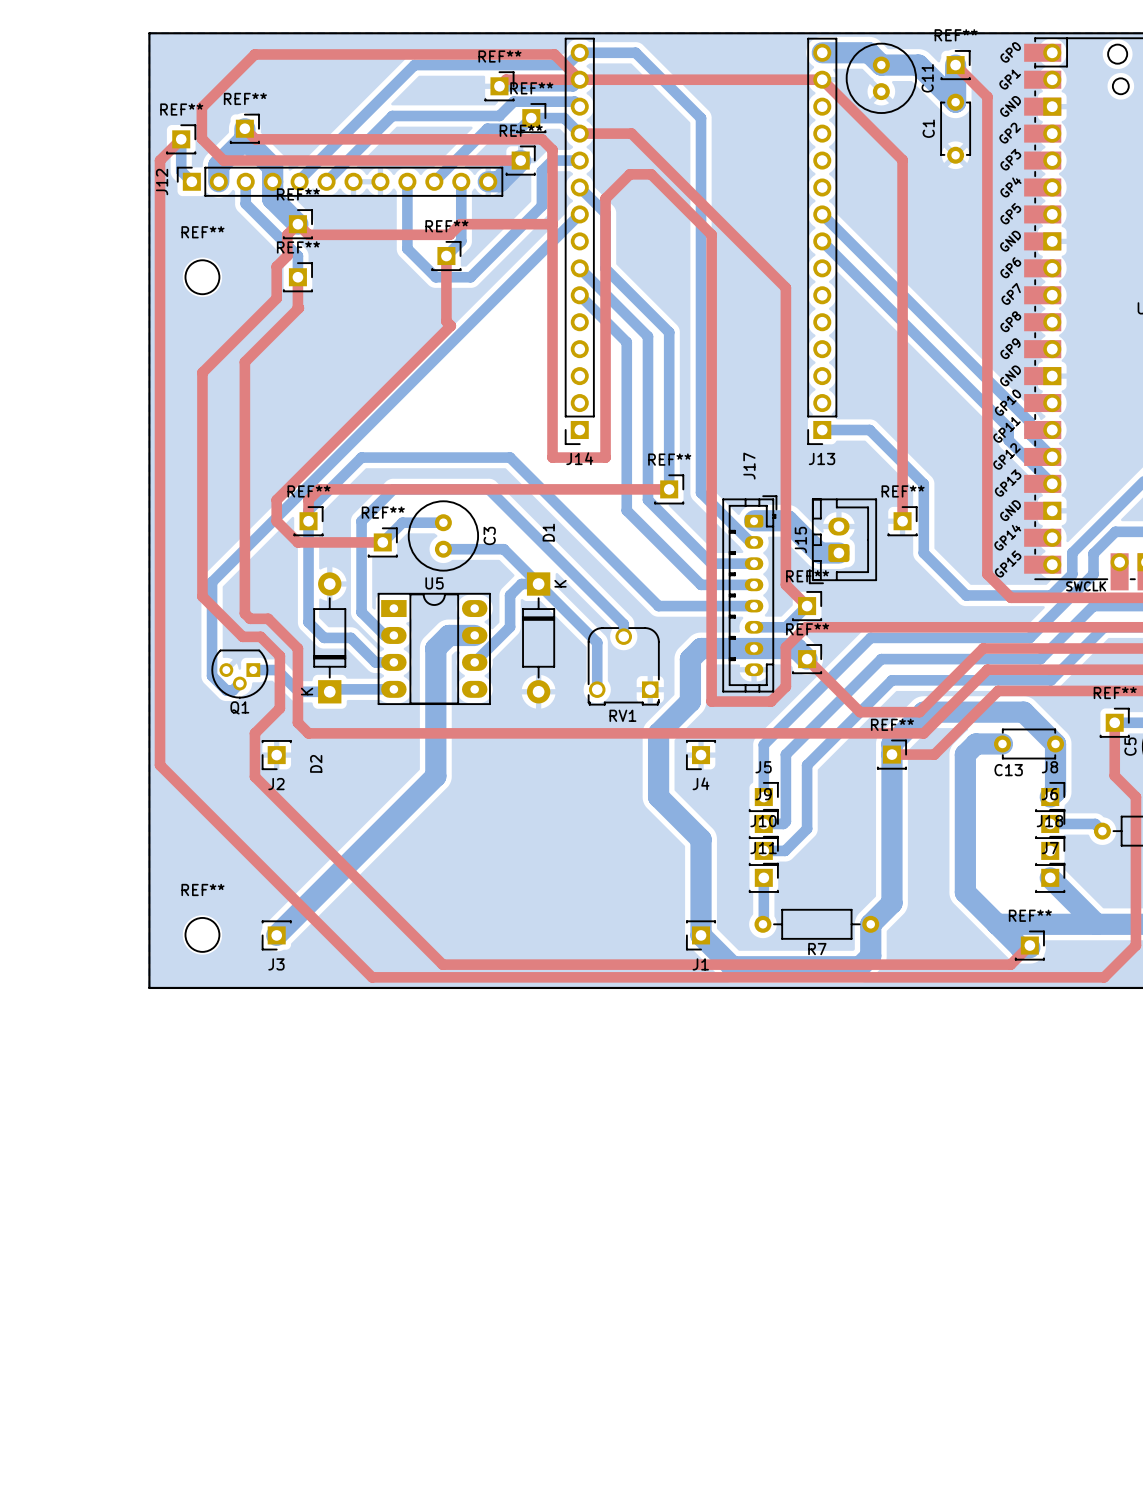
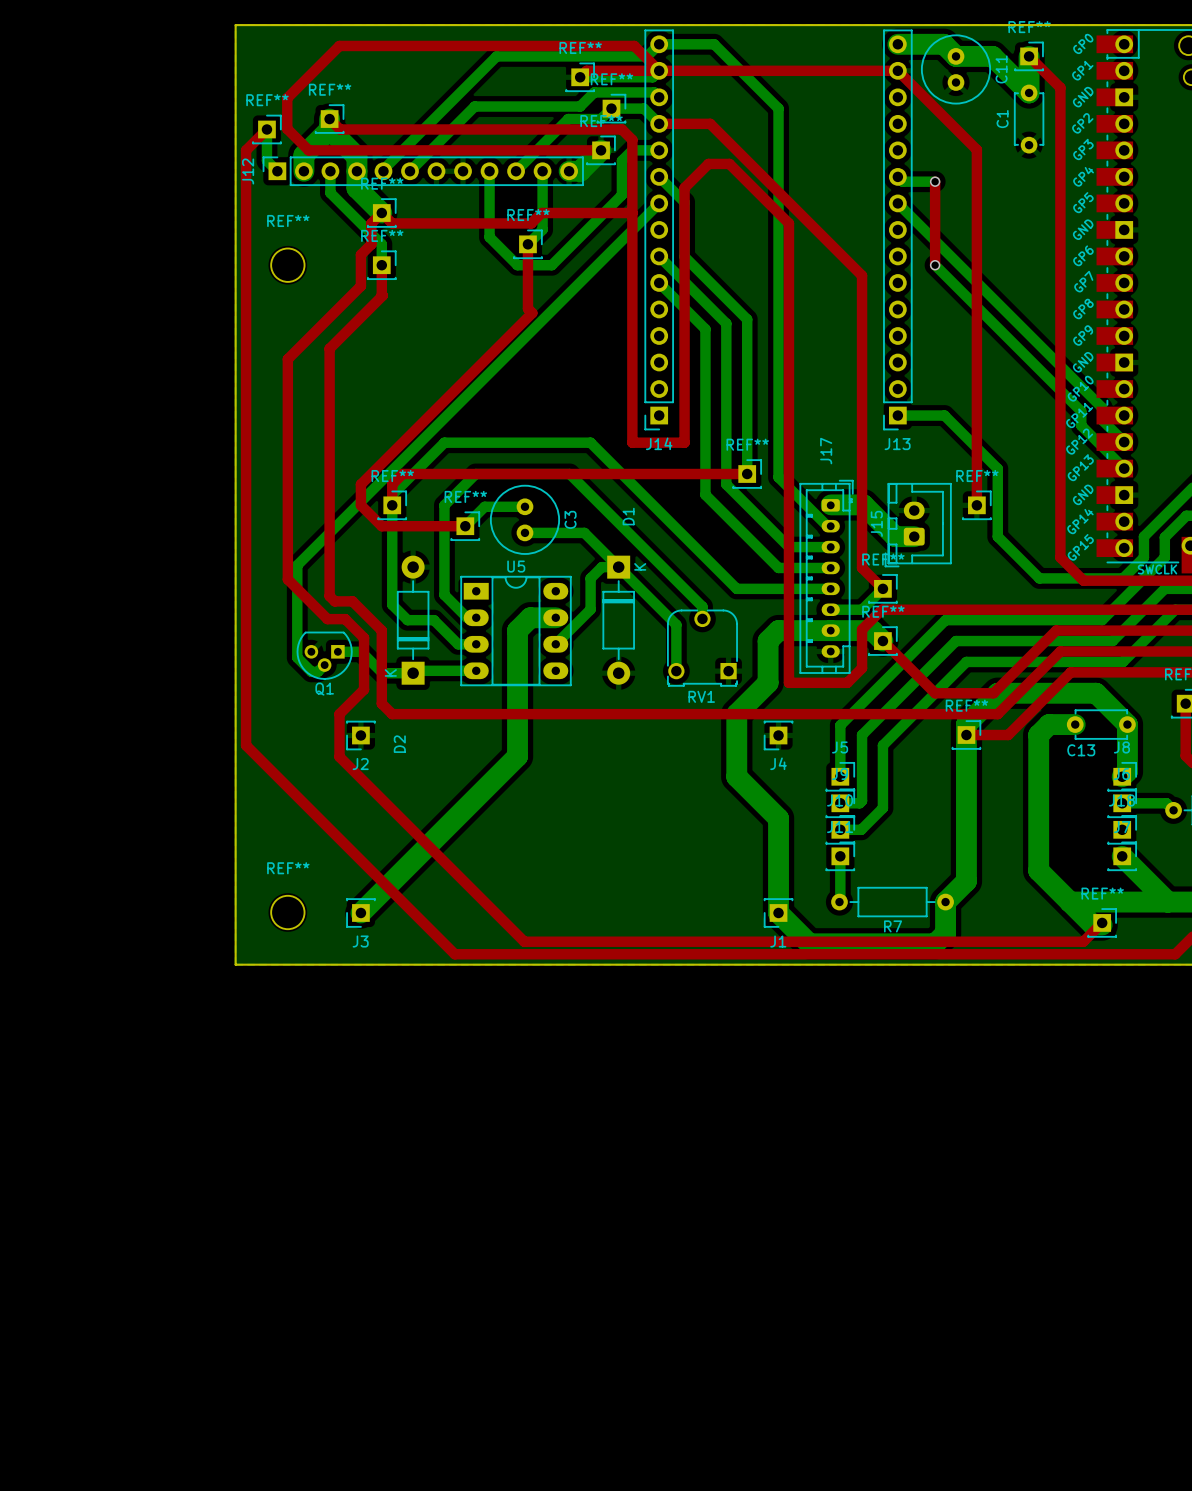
bottom track: none -> (897, 176) (902, 181) (935, 181)
top track: none -> (935, 181) (935, 265)
via: none -> (935, 181)
bottom track: (822, 241) (1008, 427) -> (935, 265) (1081, 413)
via: none -> (935, 265)

